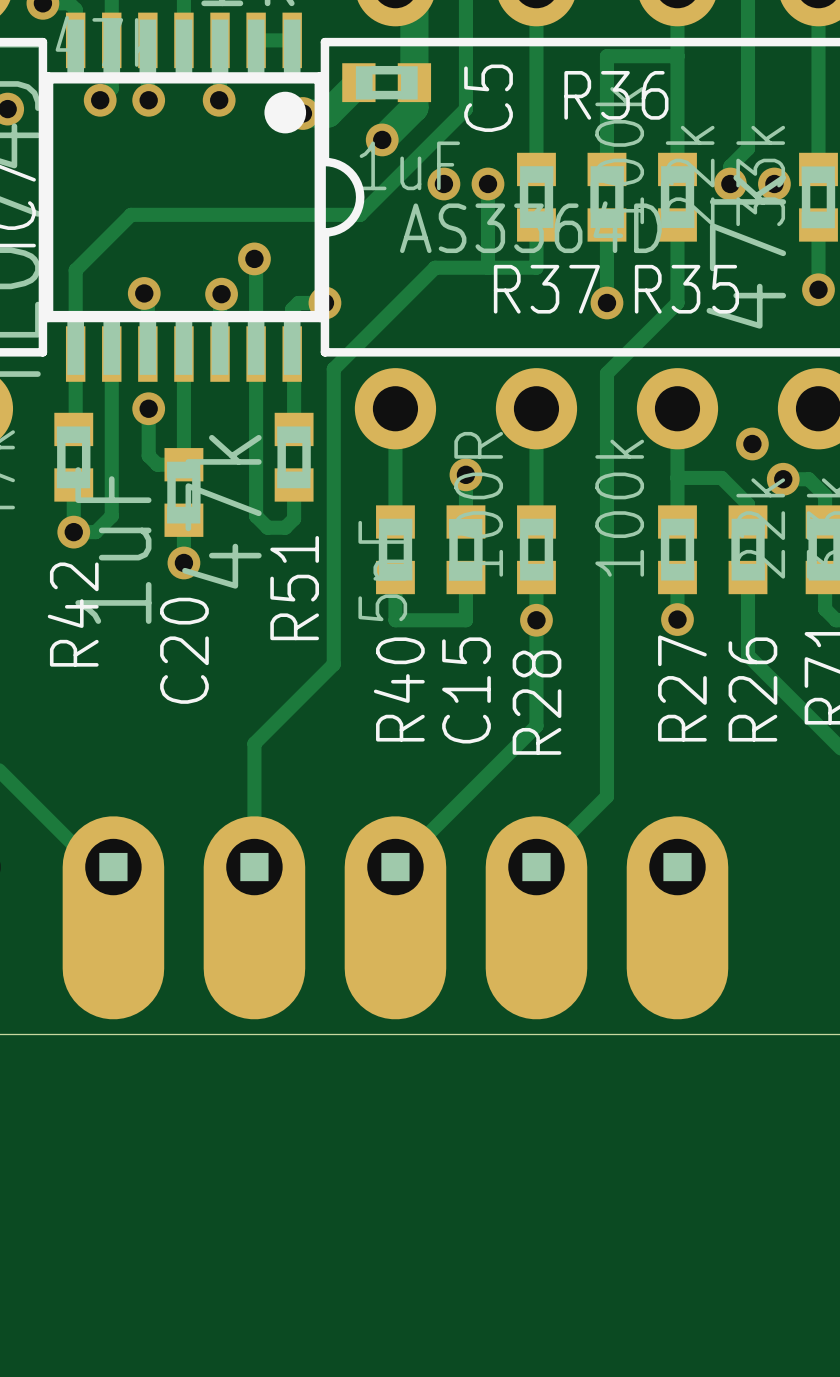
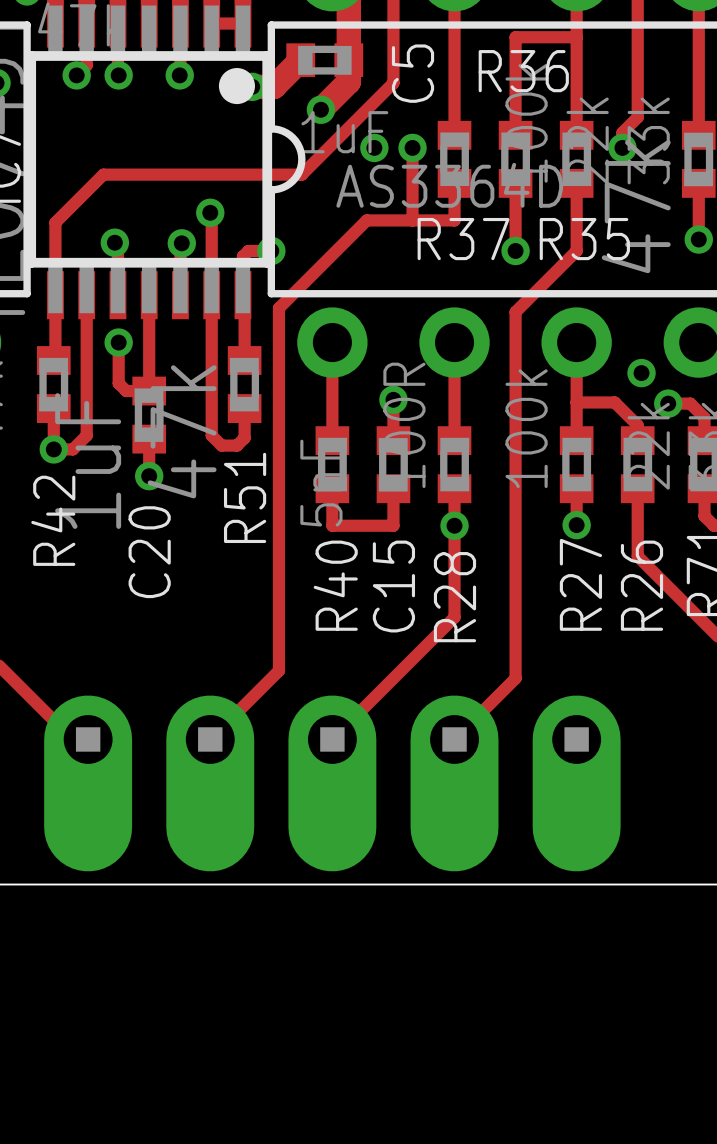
via: (774, 184) -> none
track: (333, 664) (254, 743) (254, 867) -> (278, 563) (278, 670) (210, 739)

